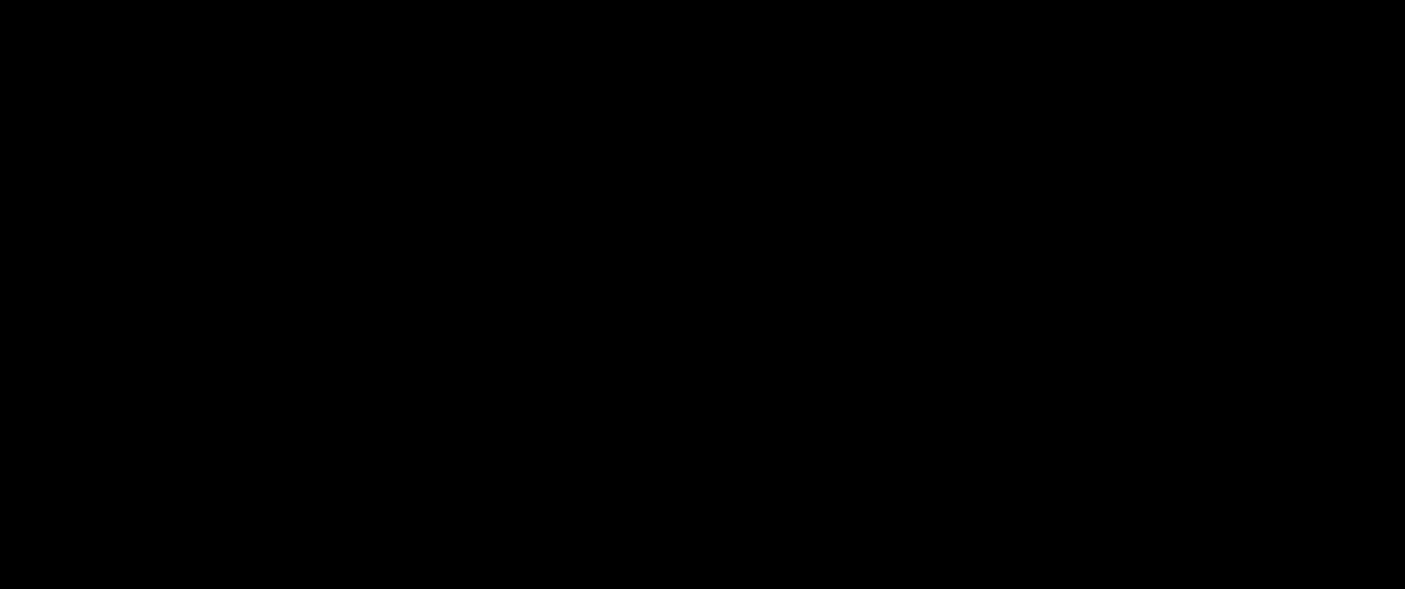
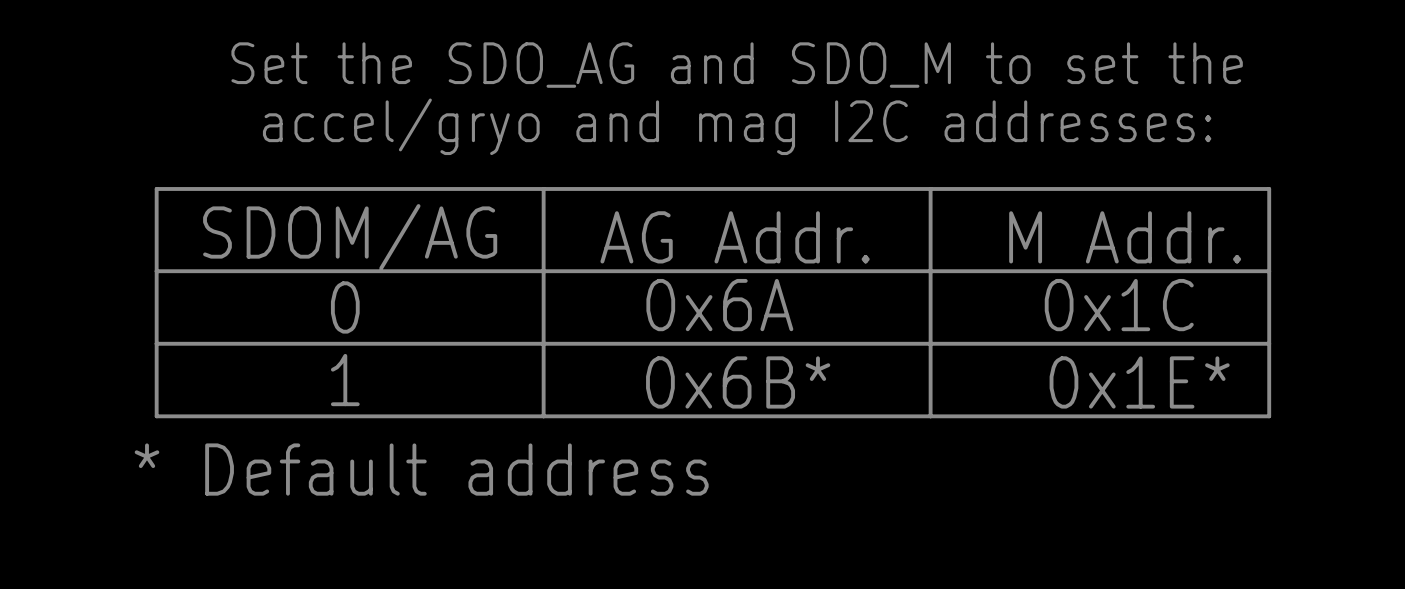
text: none -> Set the SDO_AG and SDO_M to set the (737, 65)
text: none -> accel/gryo and mag I2C addresses: (737, 126)
line: none -> (156, 188) (156, 416) (1269, 416) (1269, 188) (156, 188)
line: none -> (543, 188) (543, 416)
line: none -> (930, 188) (930, 416)
text: none -> SDOM/AG (350, 237)
text: none -> AG Addr. (735, 237)
text: none -> M Addr. (1125, 237)
line: none -> (156, 271) (1269, 271)
text: none -> 0x6A (719, 305)
text: none -> 0x1C (1119, 305)
text: none -> 0 (345, 307)
line: none -> (156, 343) (1269, 343)
text: none -> 1 (345, 380)
text: none -> 0x6B* (738, 382)
text: none -> 0x1E* (1139, 382)
text: none -> * Default address (421, 469)

